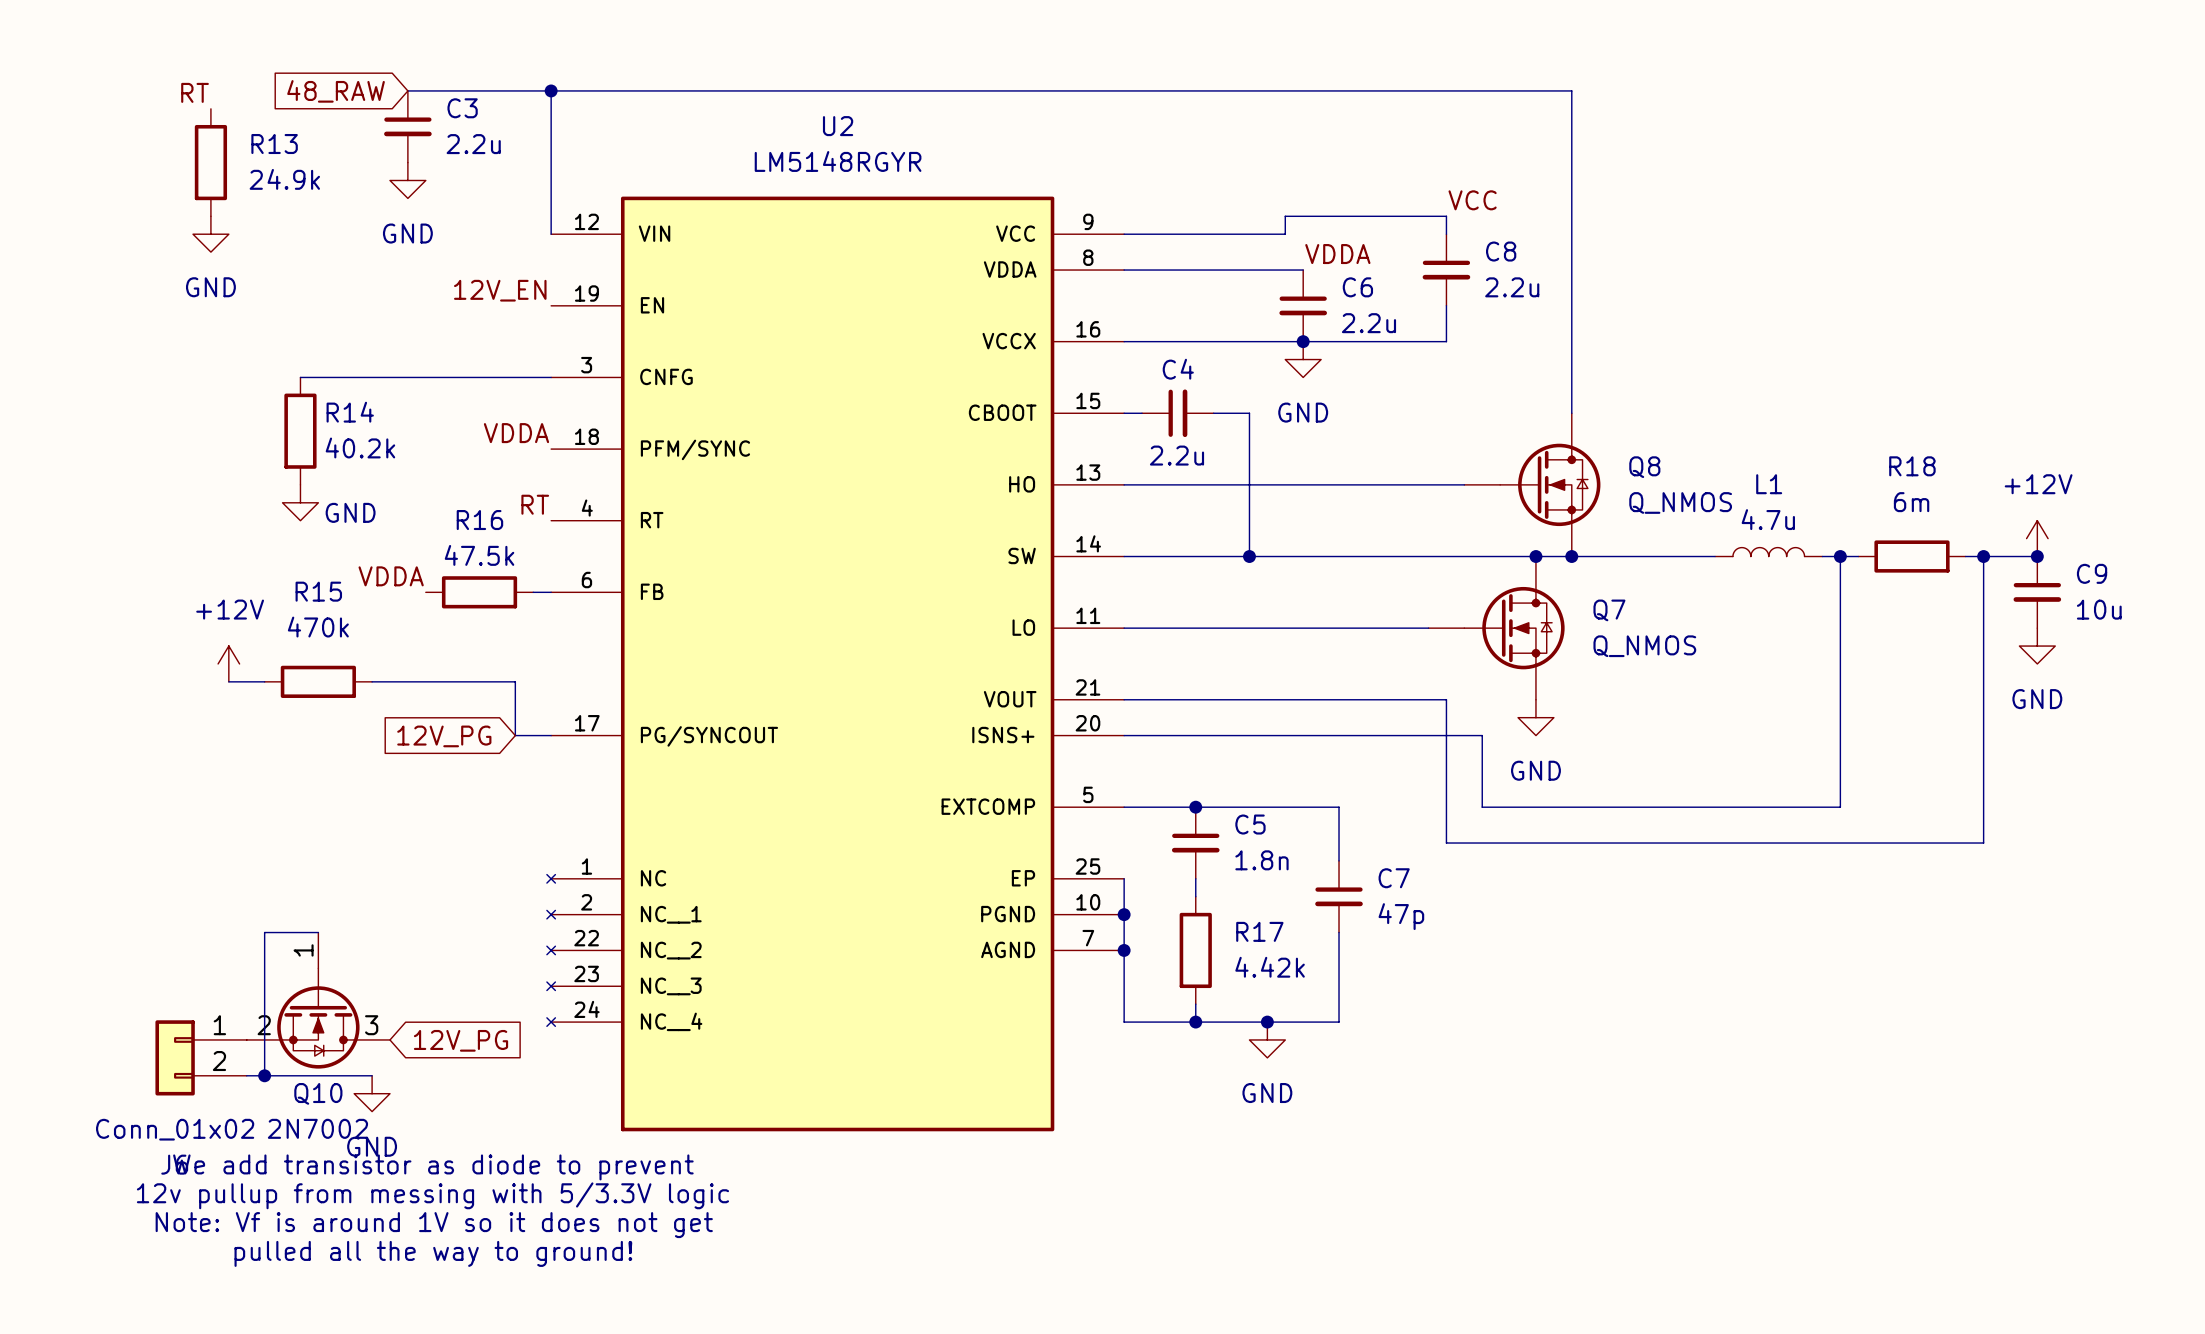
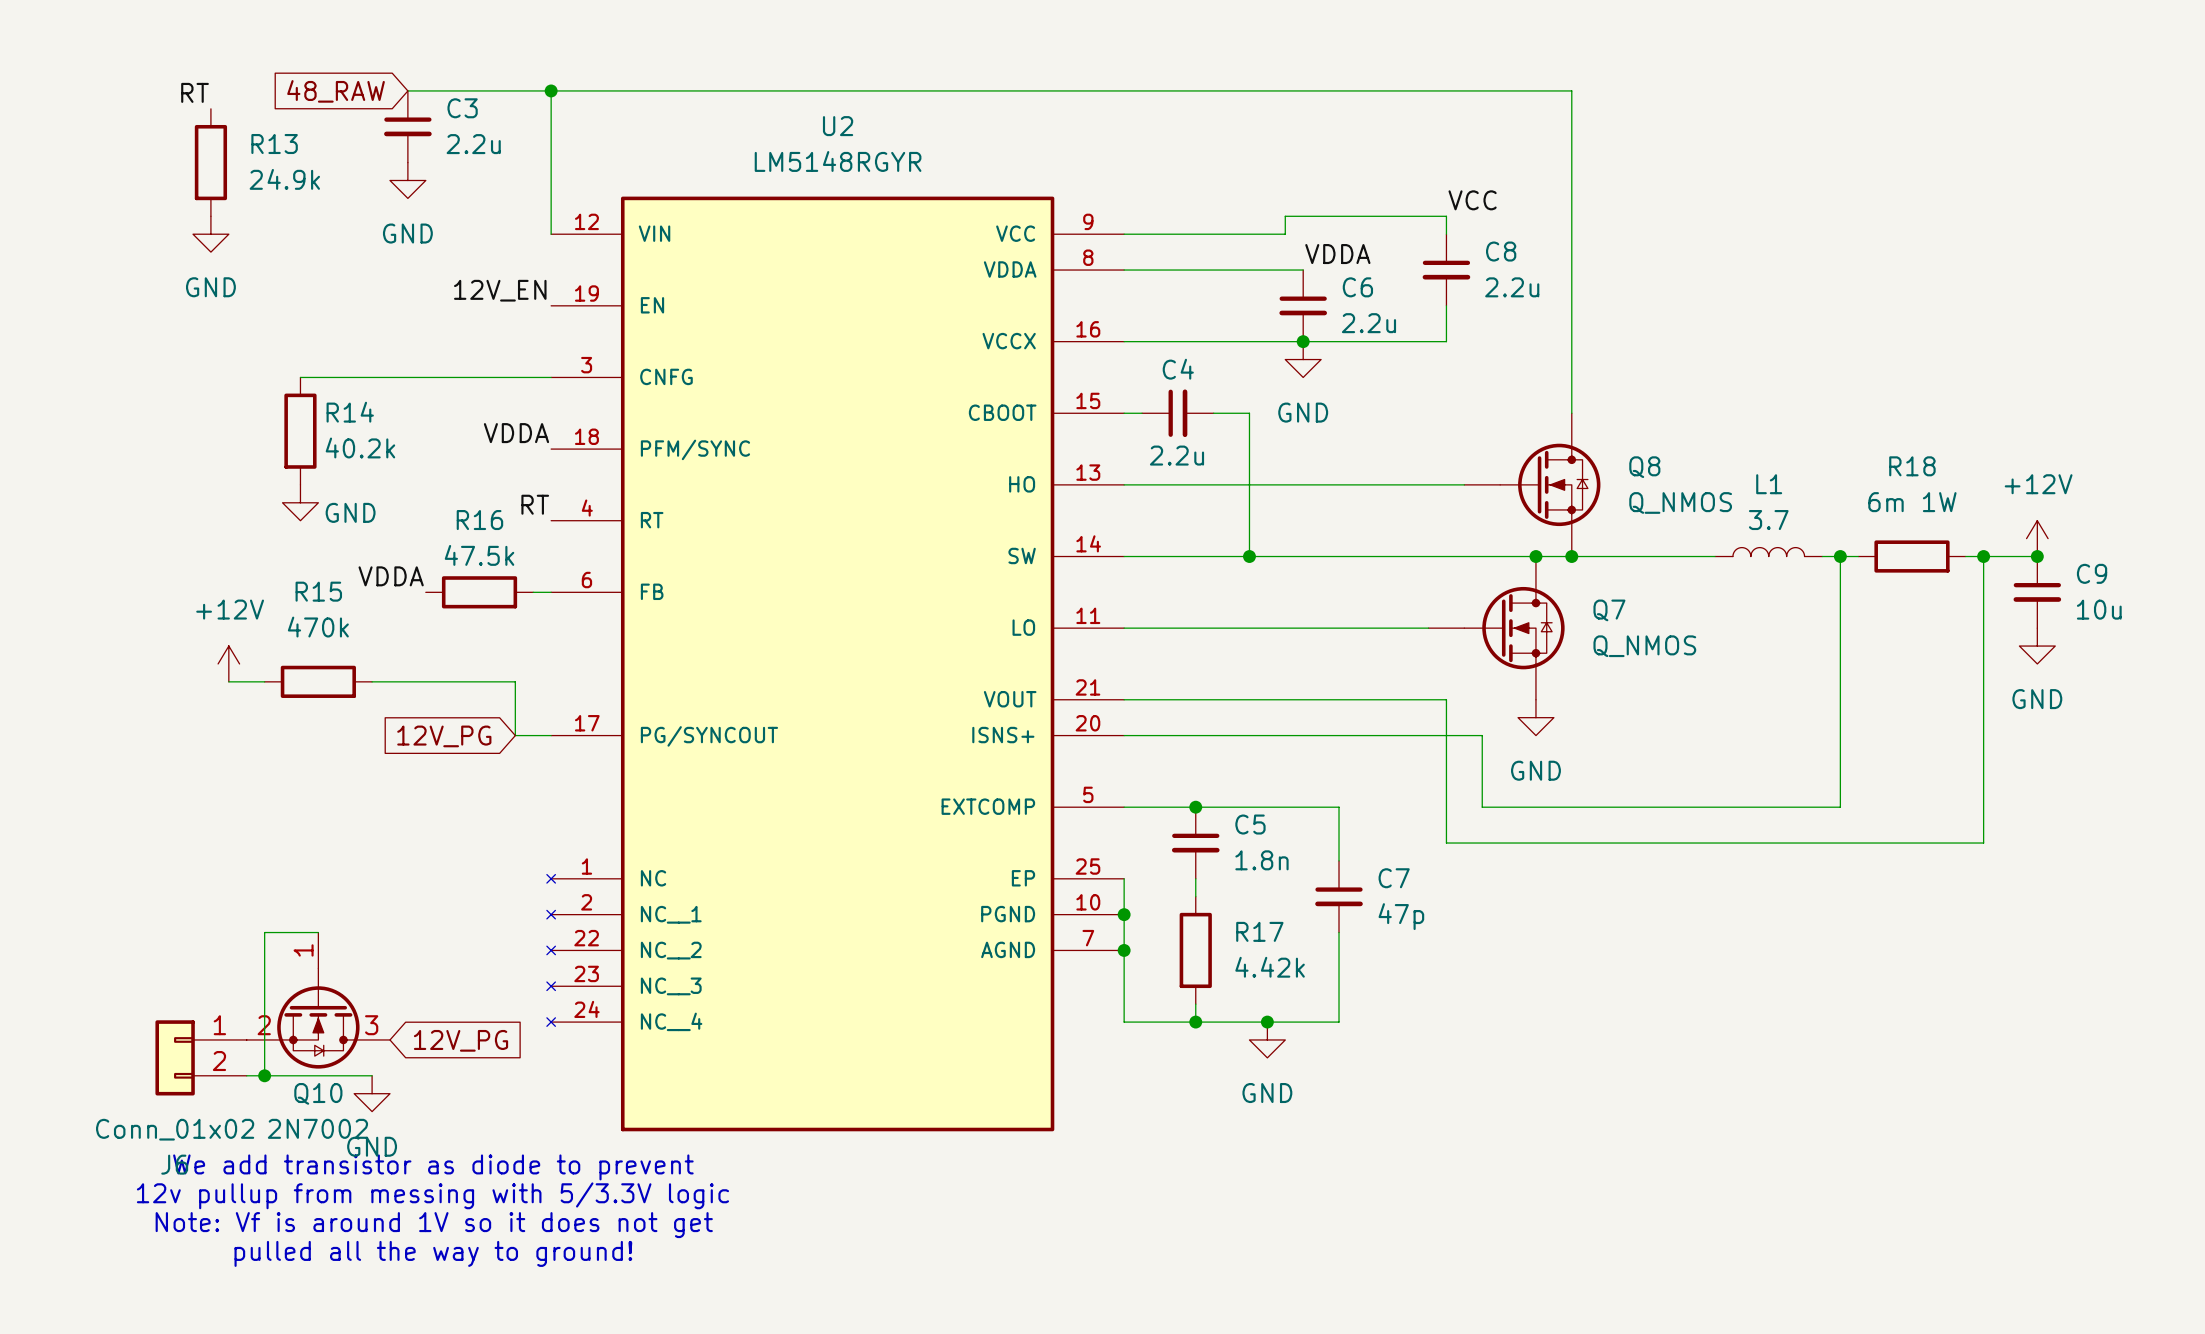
R18 value: 6m (1911, 502) -> 6m 1W (1912, 502)
L1 value: 4.7u (1768, 519) -> 3.7 (1768, 520)

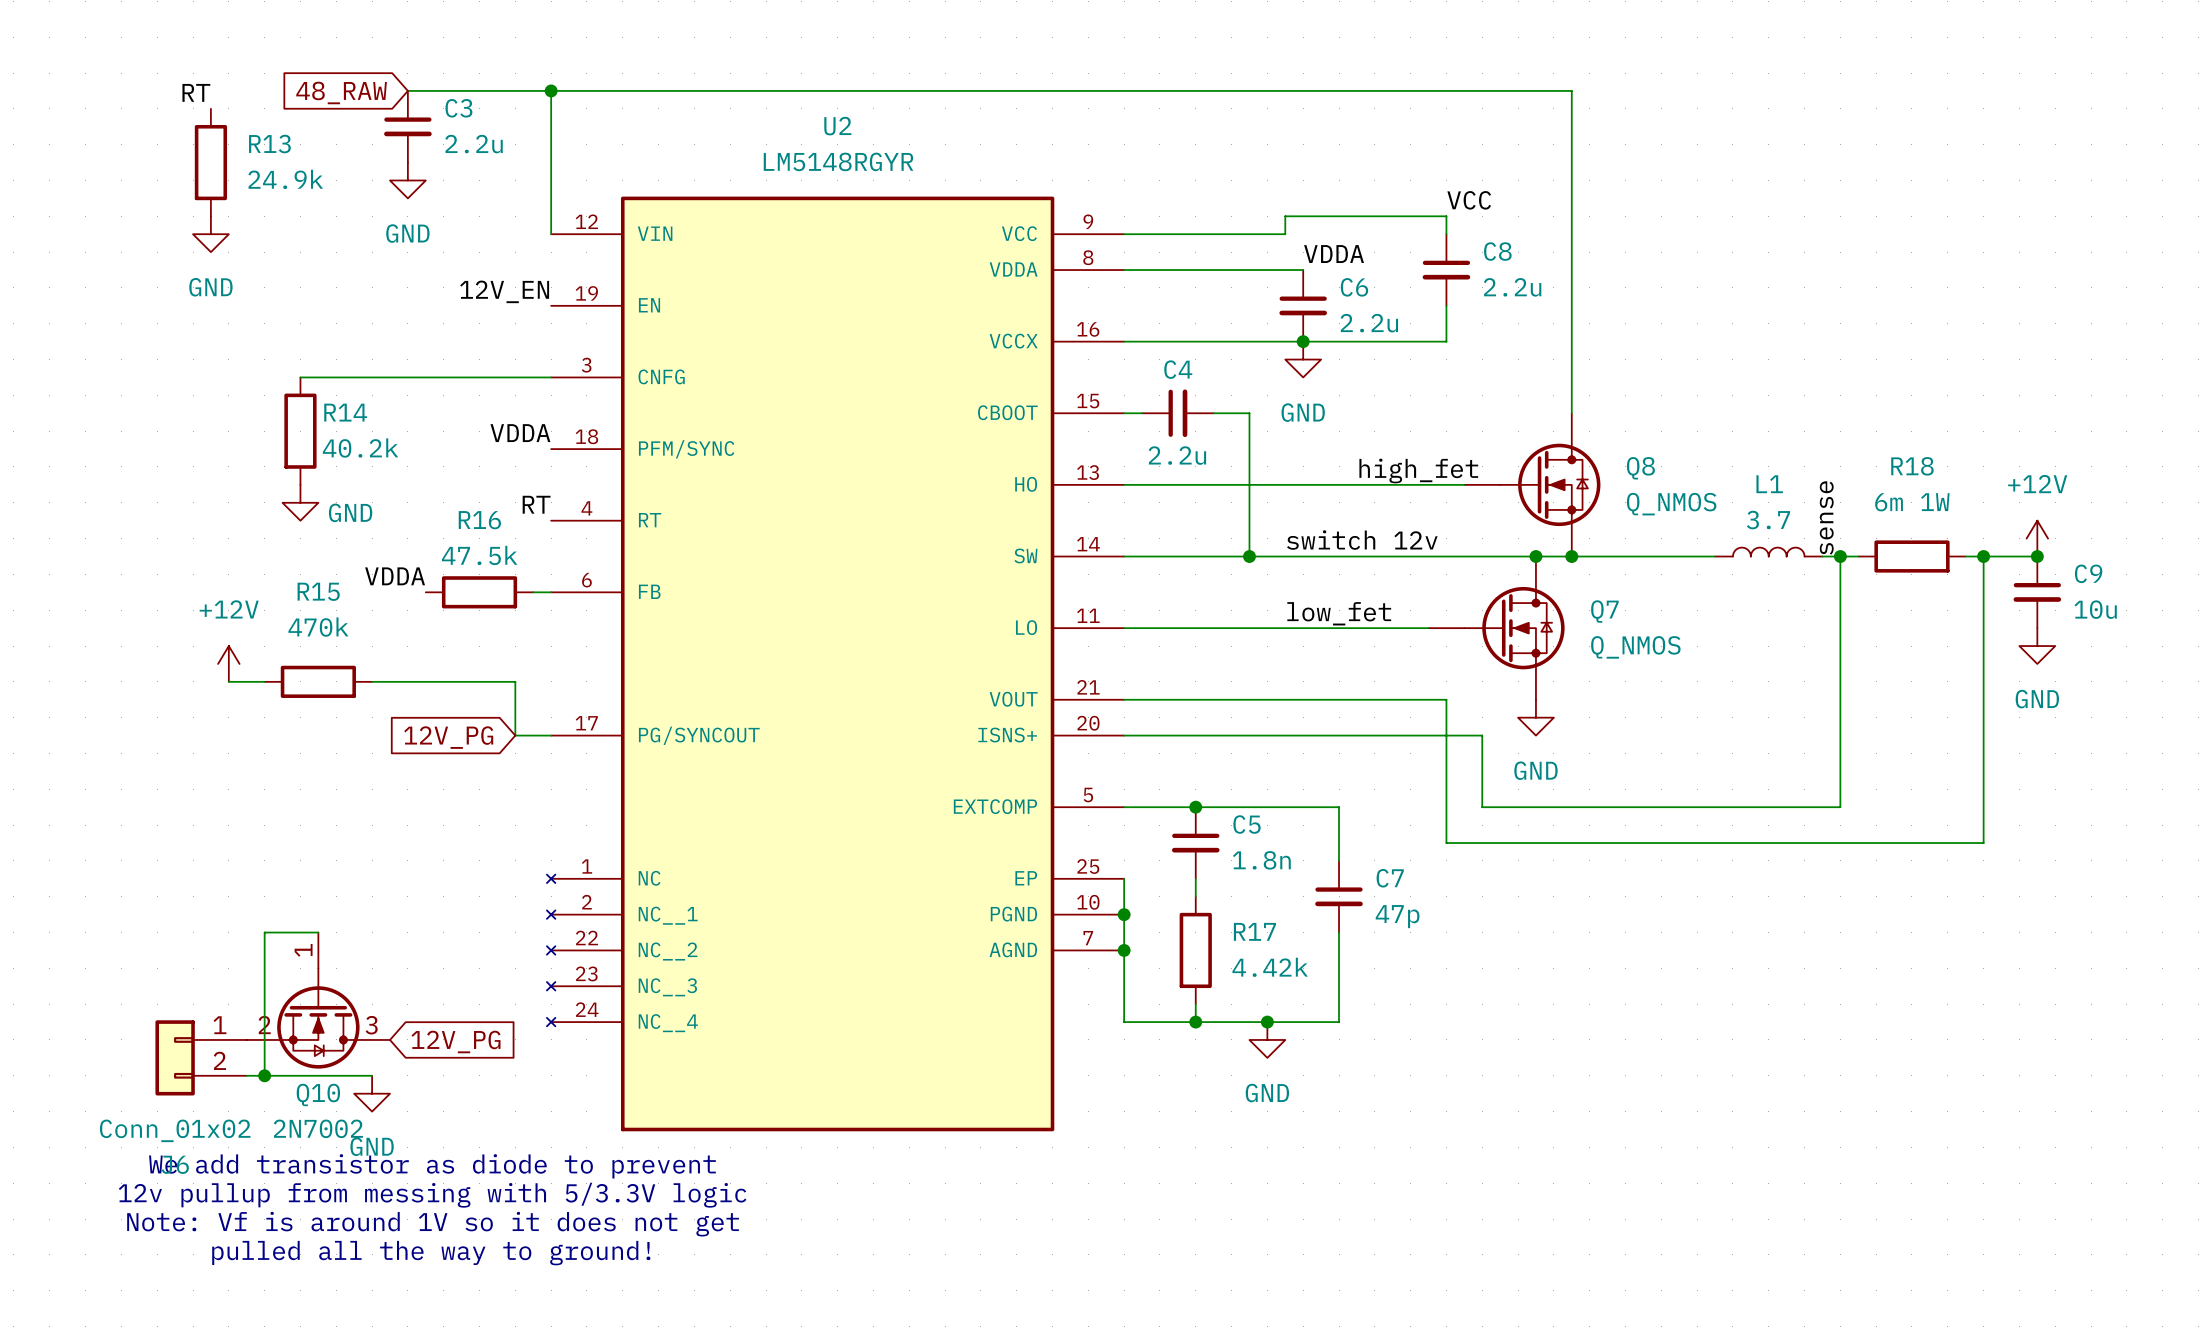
label: none -> high_fet (1418, 470)
label: none -> sense (1826, 518)
label: none -> switch 12v (1362, 540)
label: none -> low_fet (1339, 613)

